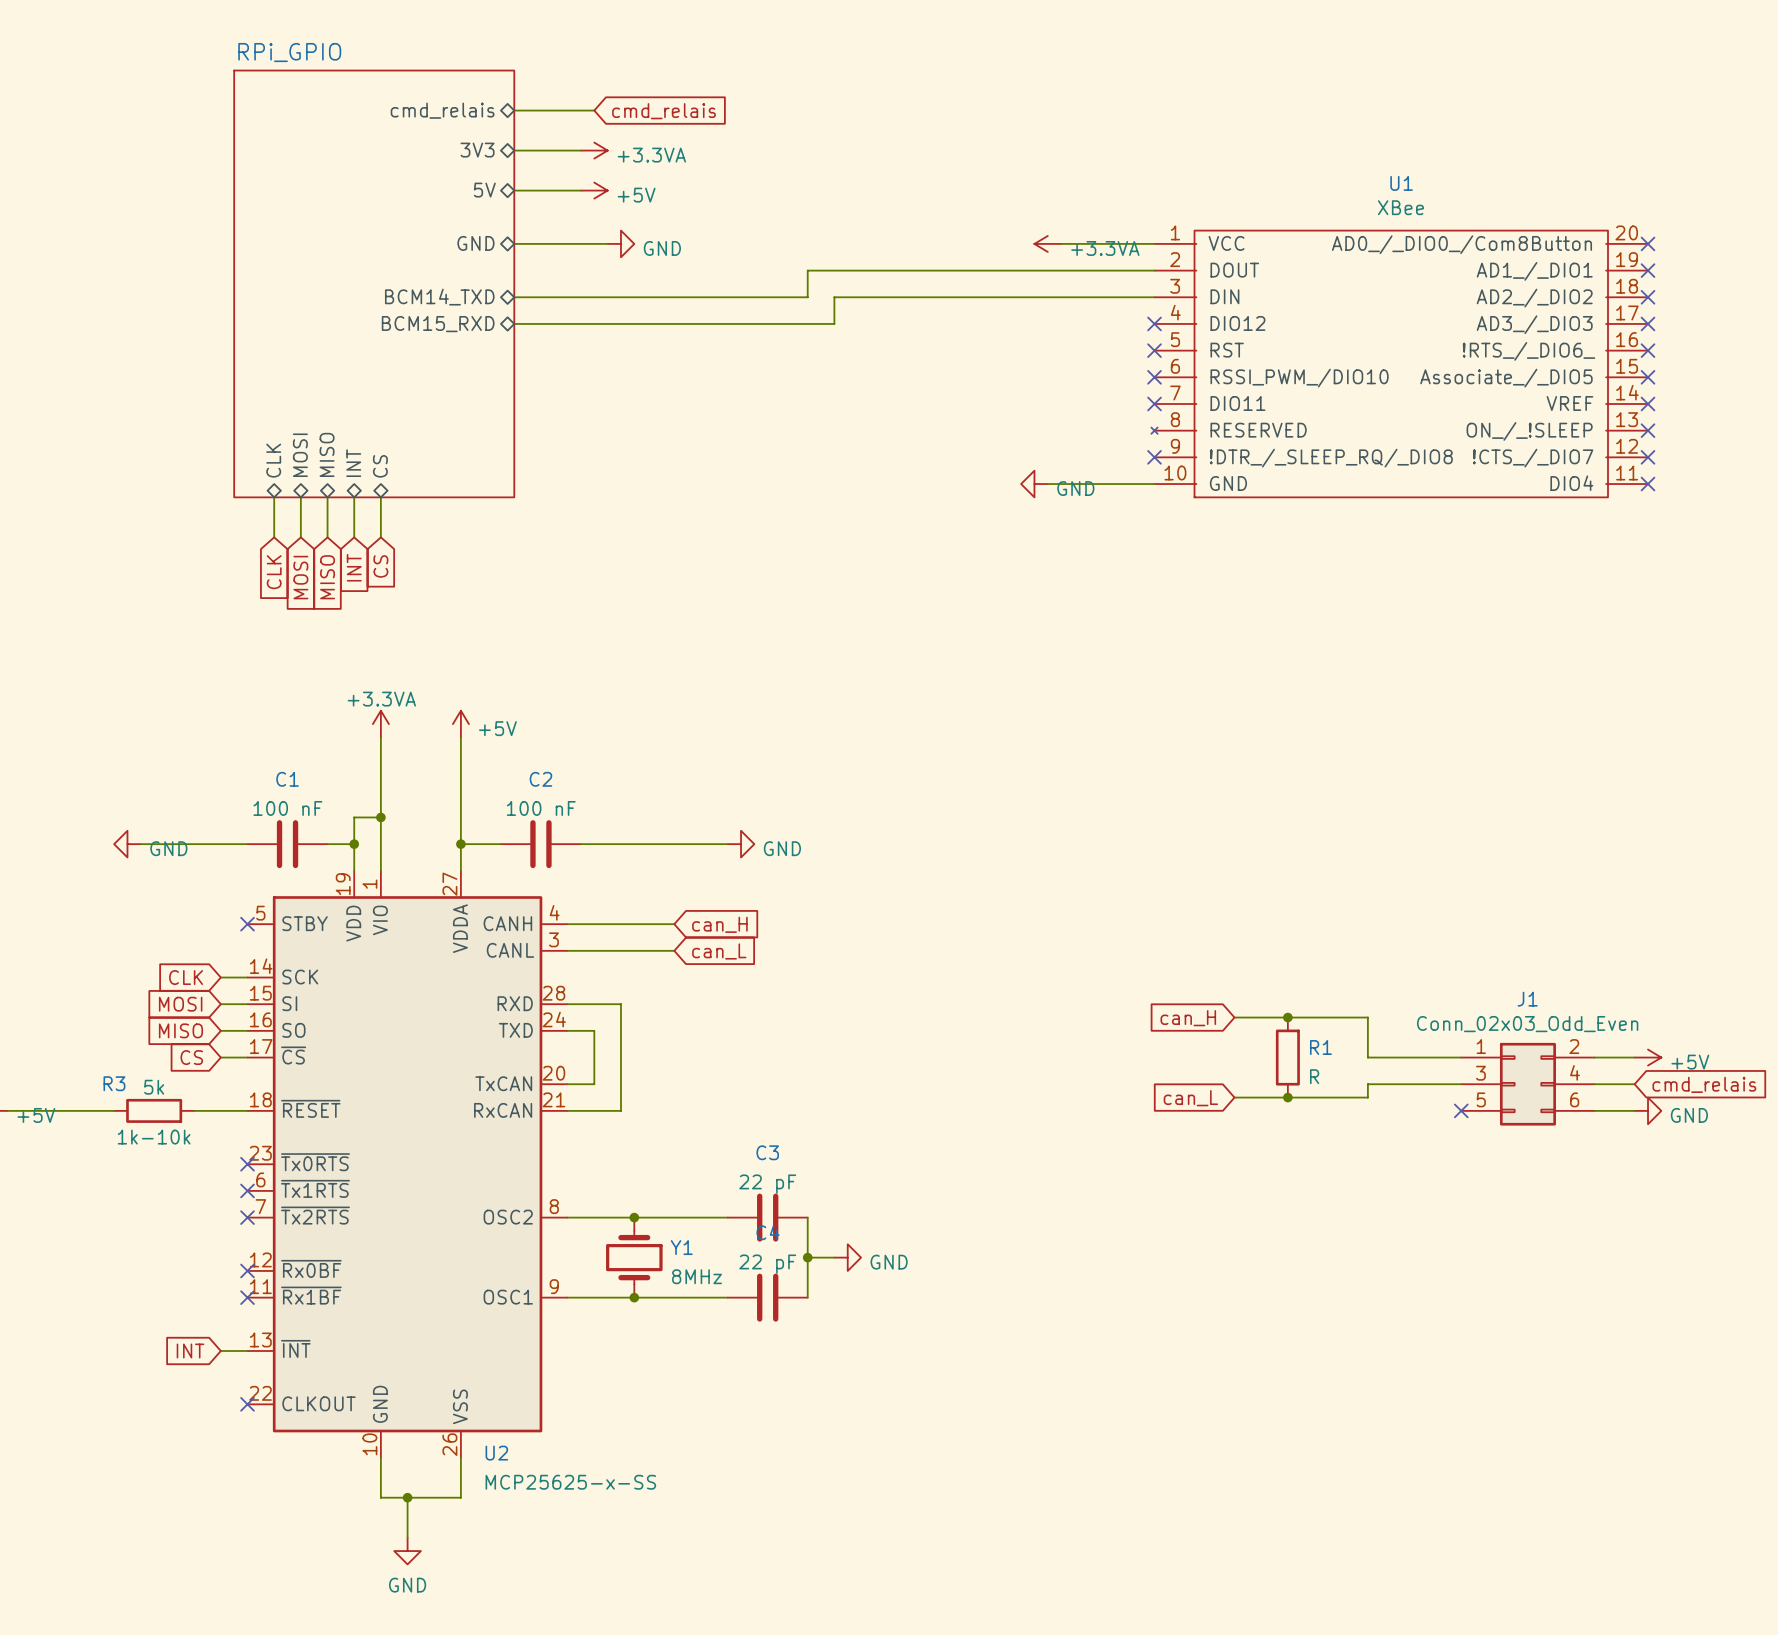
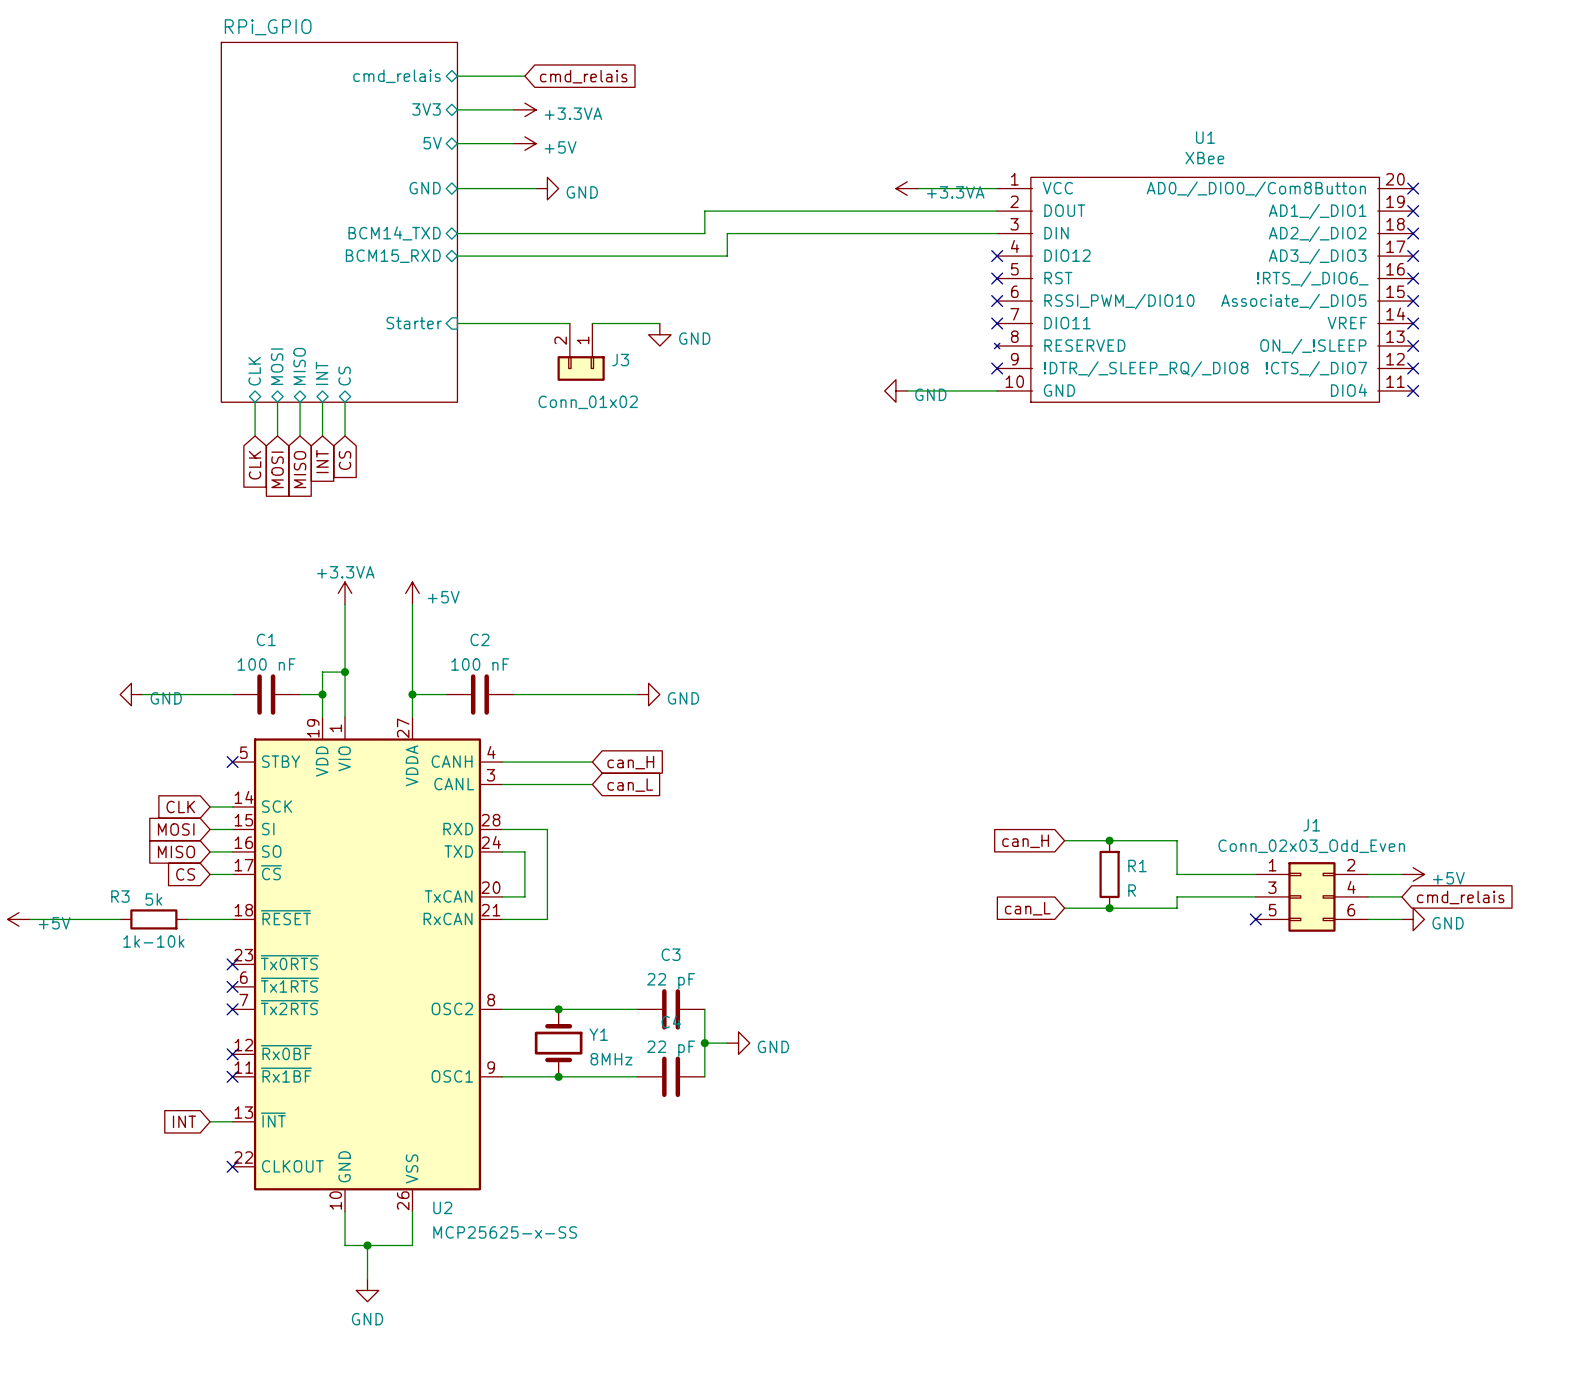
sheet pin: none -> Starter (414, 323)
wire: none -> (457, 323) (569, 323)
wire: none -> (592, 323) (659, 323)
power symbol: none -> GND (659, 334)
J3: none -> Conn_01x02 (581, 352)

